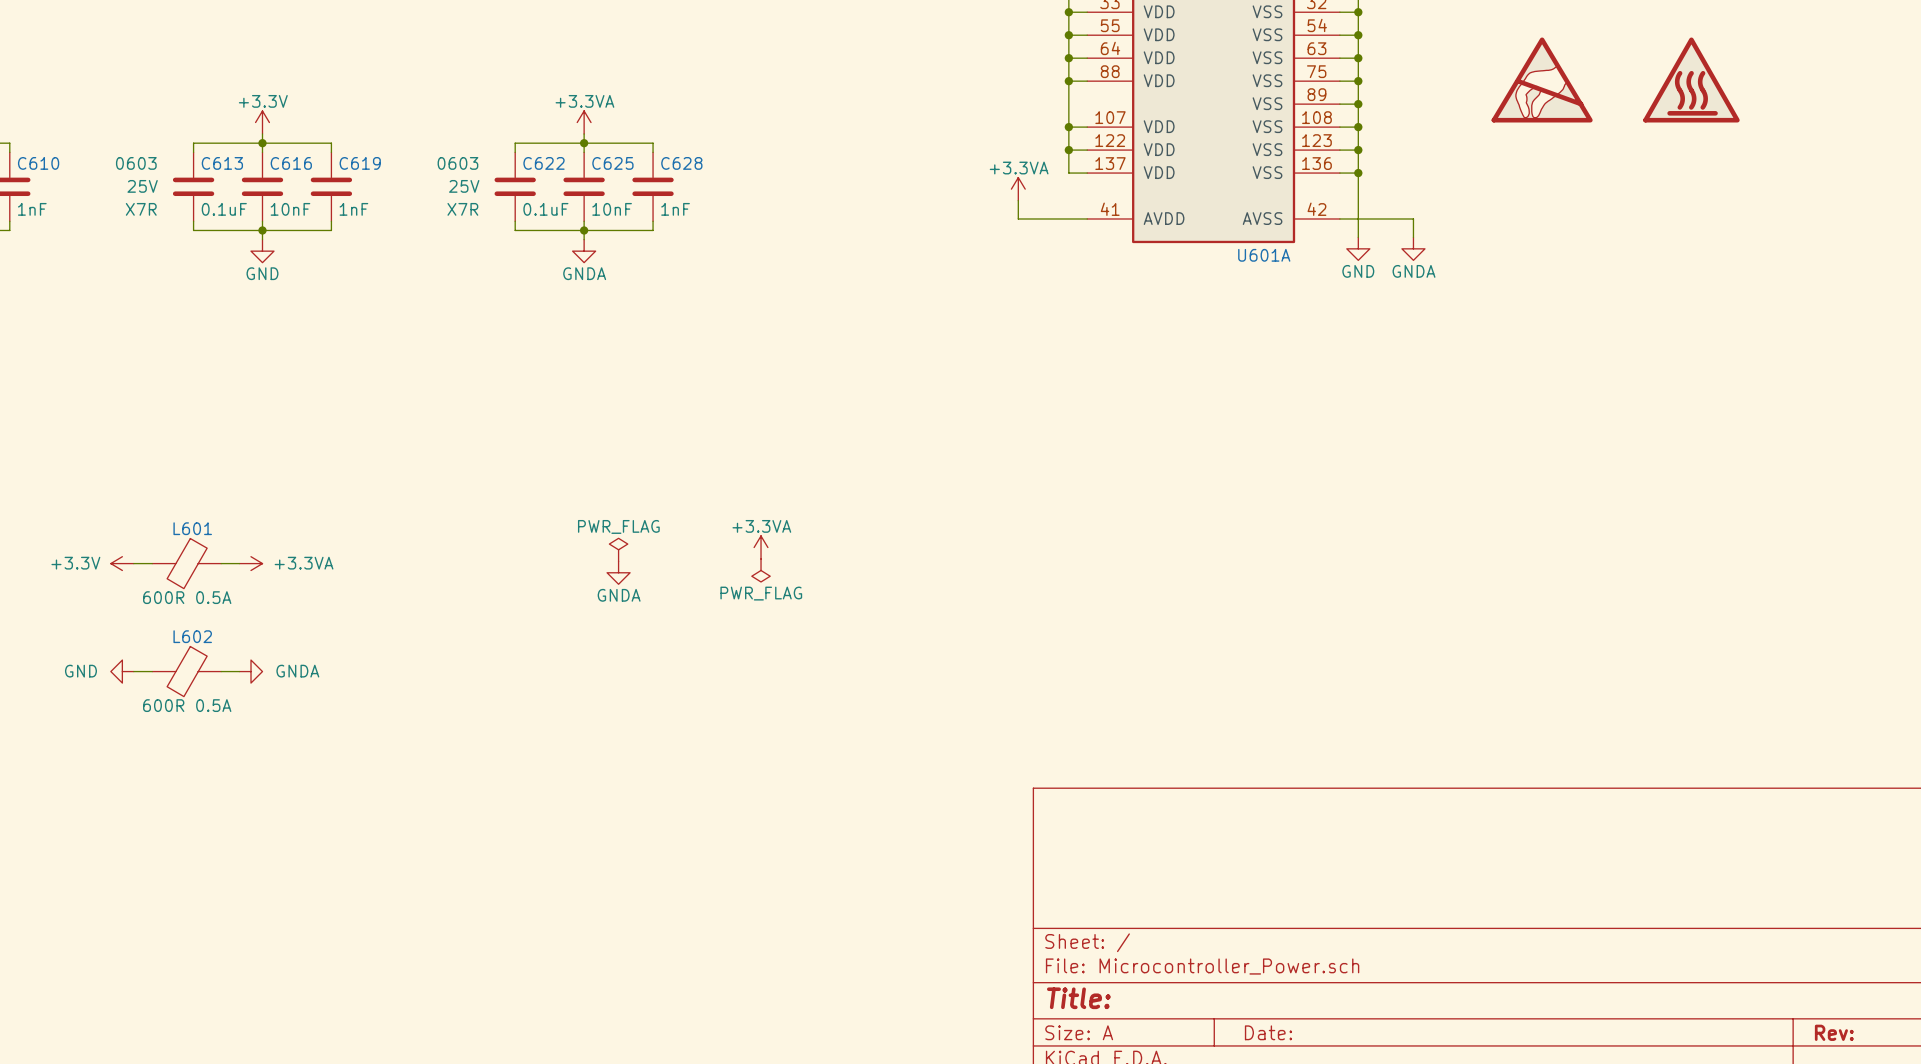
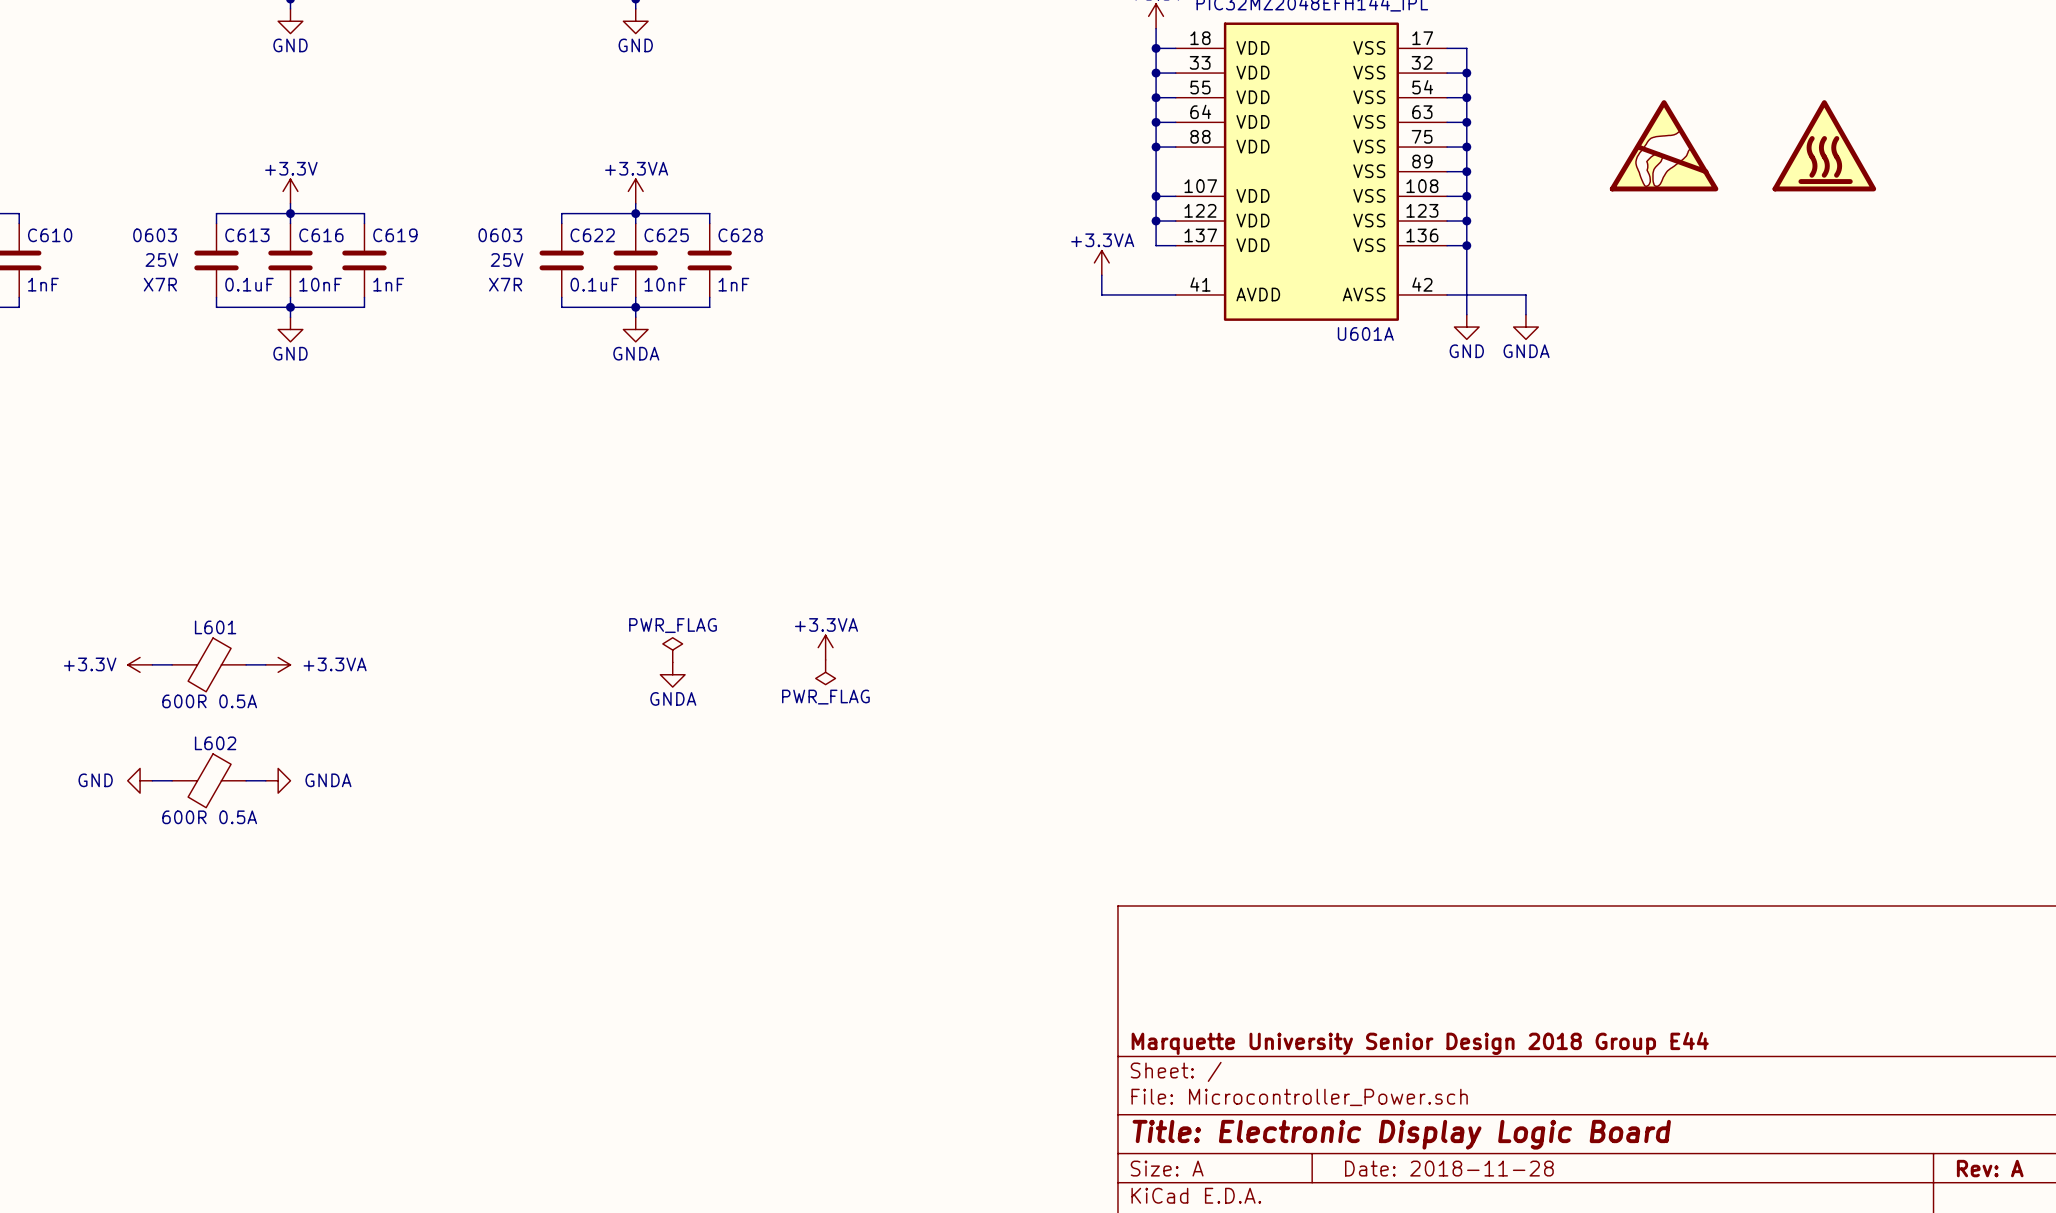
title block: none -> Marquette University Senior Design 2018 Group E44 (1420, 1043)
title block: Title: (1078, 998) -> Title: Electronic Display Logic Board (1401, 1134)
title block: Date: (1268, 1032) -> Date: 2018-11-28 (1449, 1168)
title block: Rev: (1834, 1032) -> Rev: A (1990, 1168)

